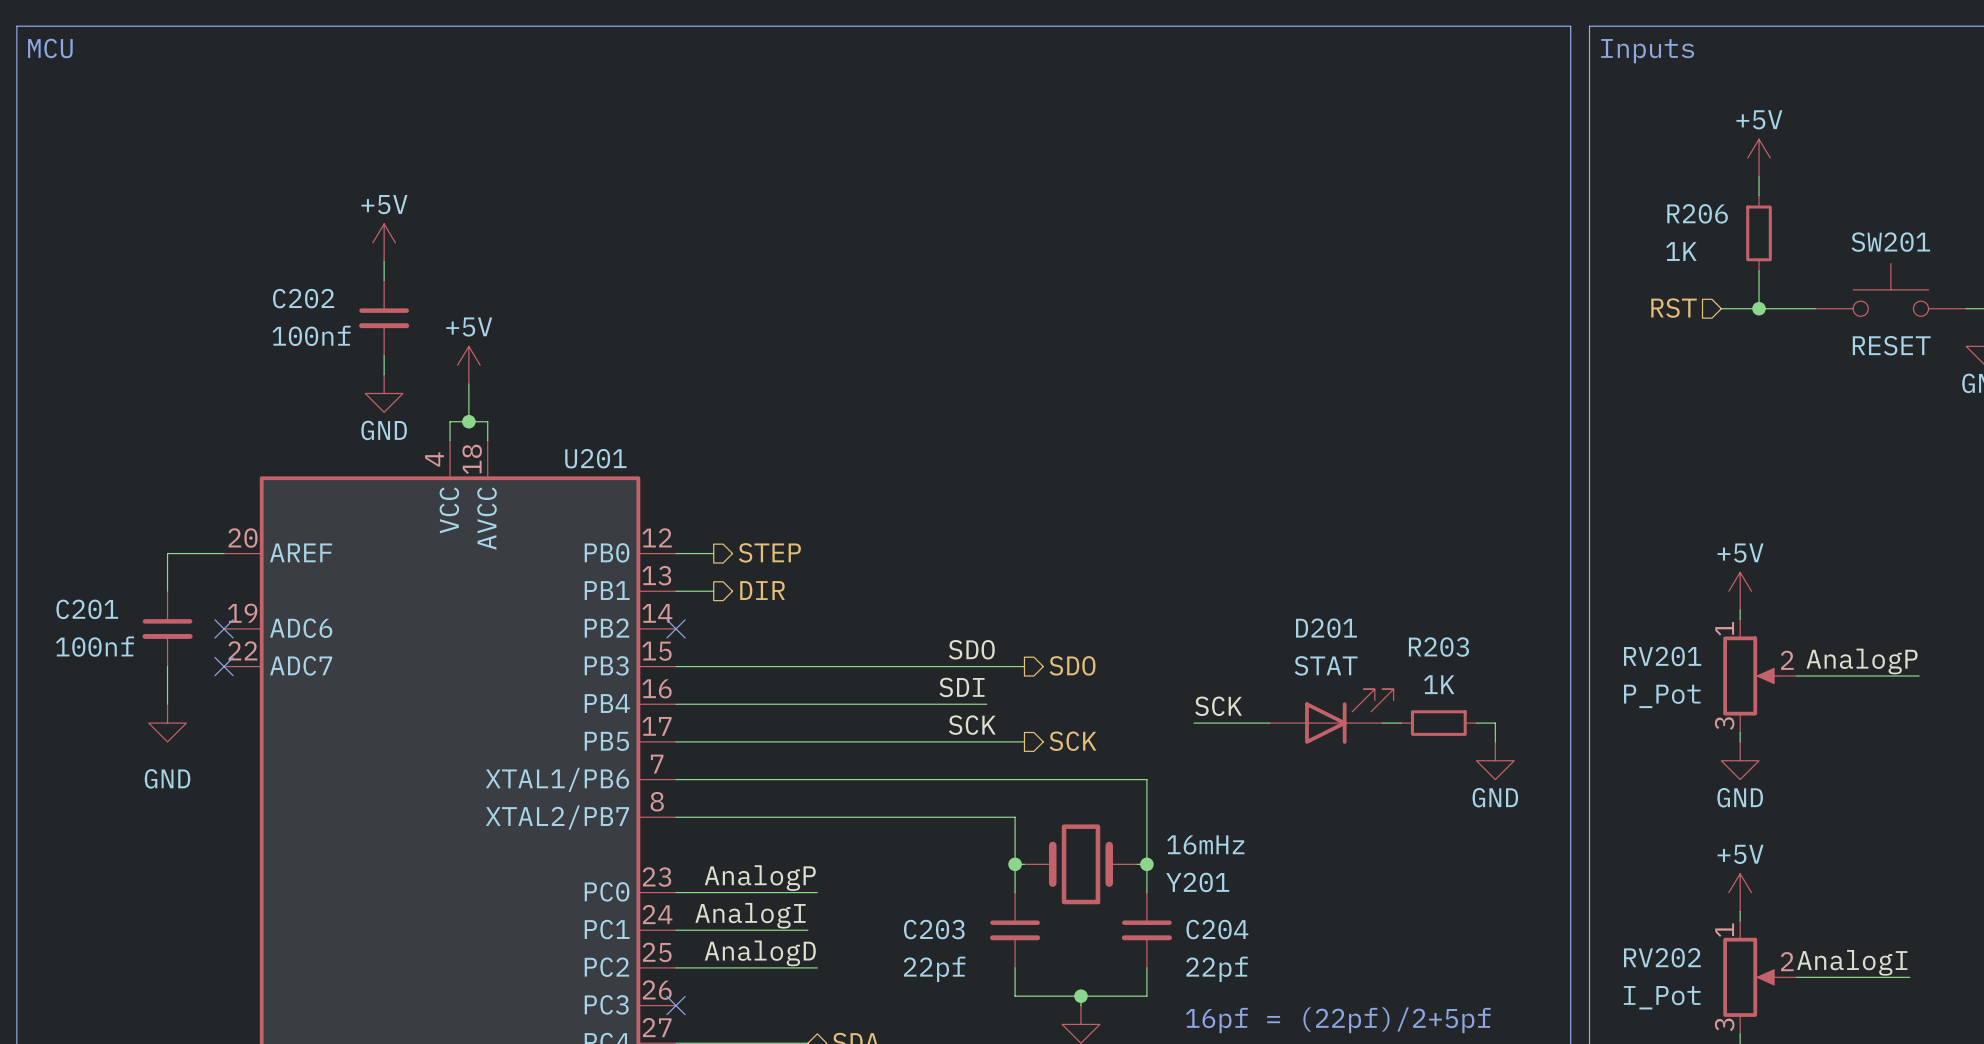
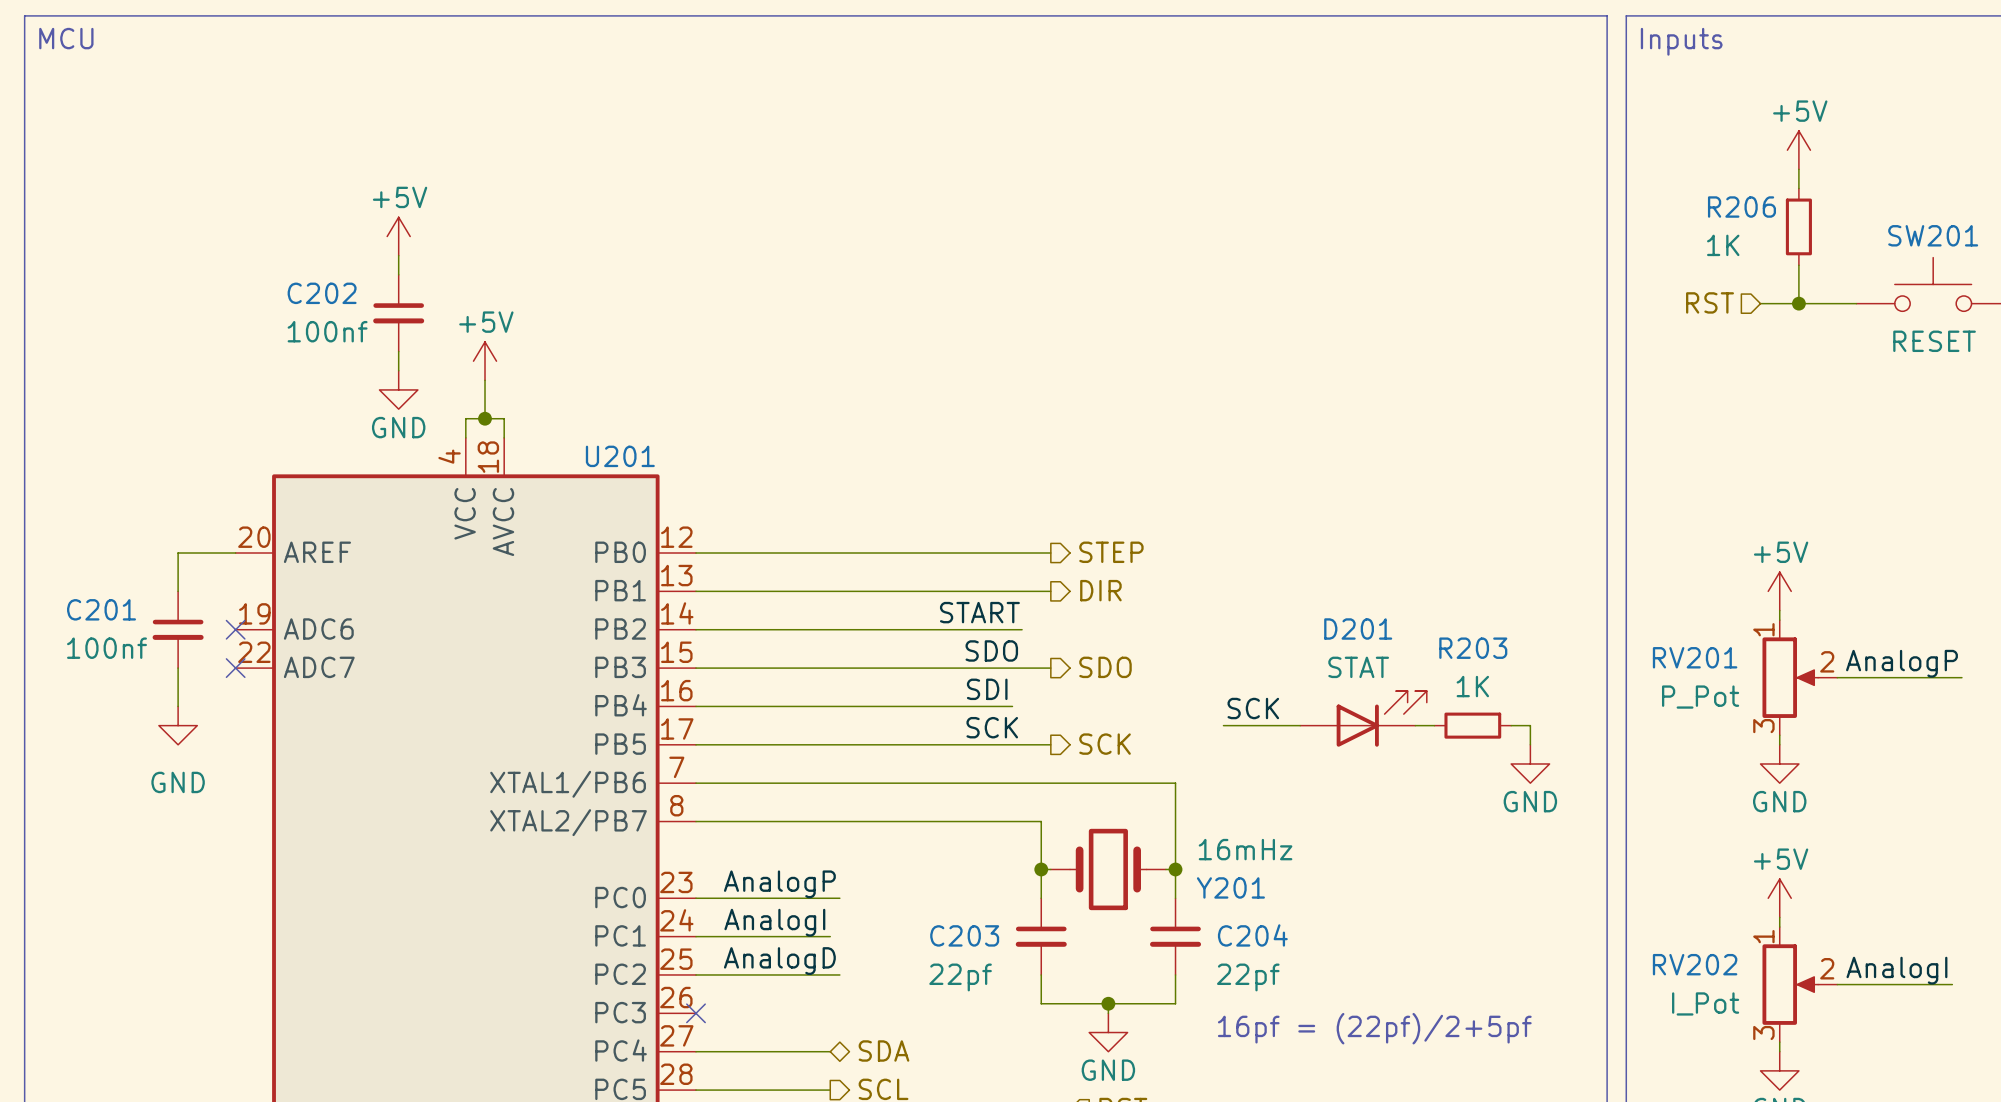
hierarchical label position: STEP (769, 552) -> STEP (1111, 552)
wire: none -> (734, 553) (1050, 553)
hierarchical label position: DIR (762, 590) -> DIR (1100, 590)
wire: none -> (734, 591) (1050, 591)
label: none -> START (979, 612)
wire: none -> (695, 629) (1022, 629)
no-connect mark: (676, 628) -> none

